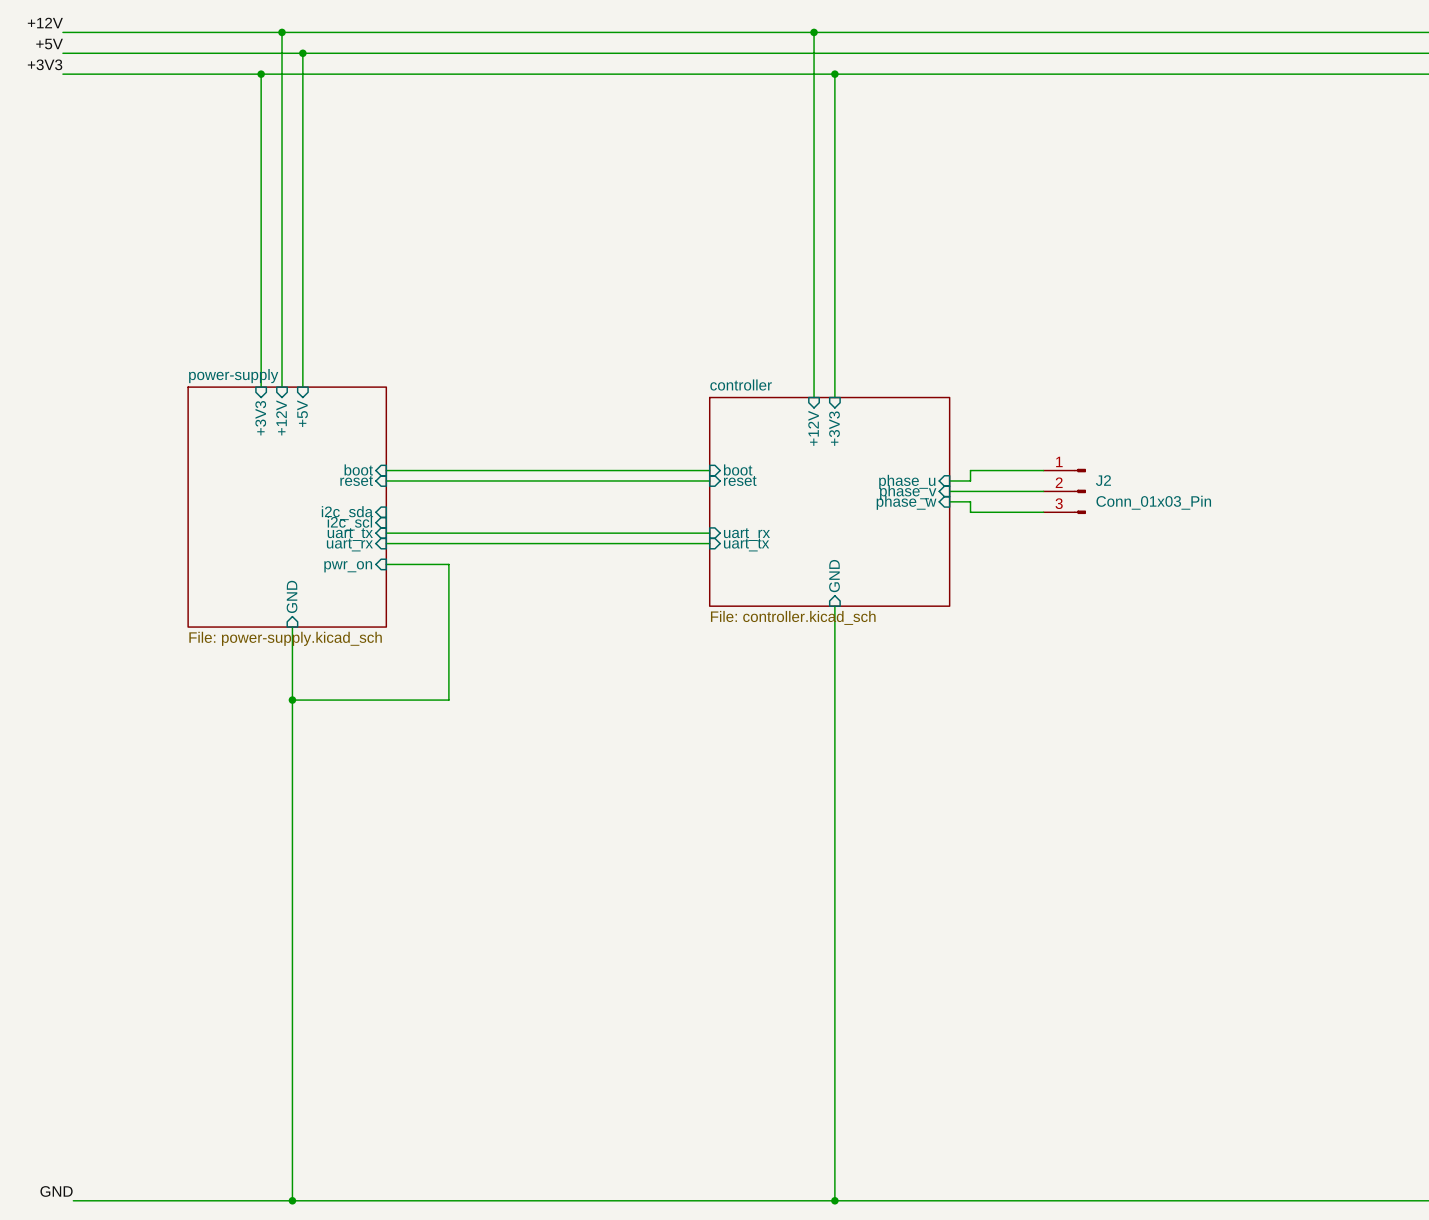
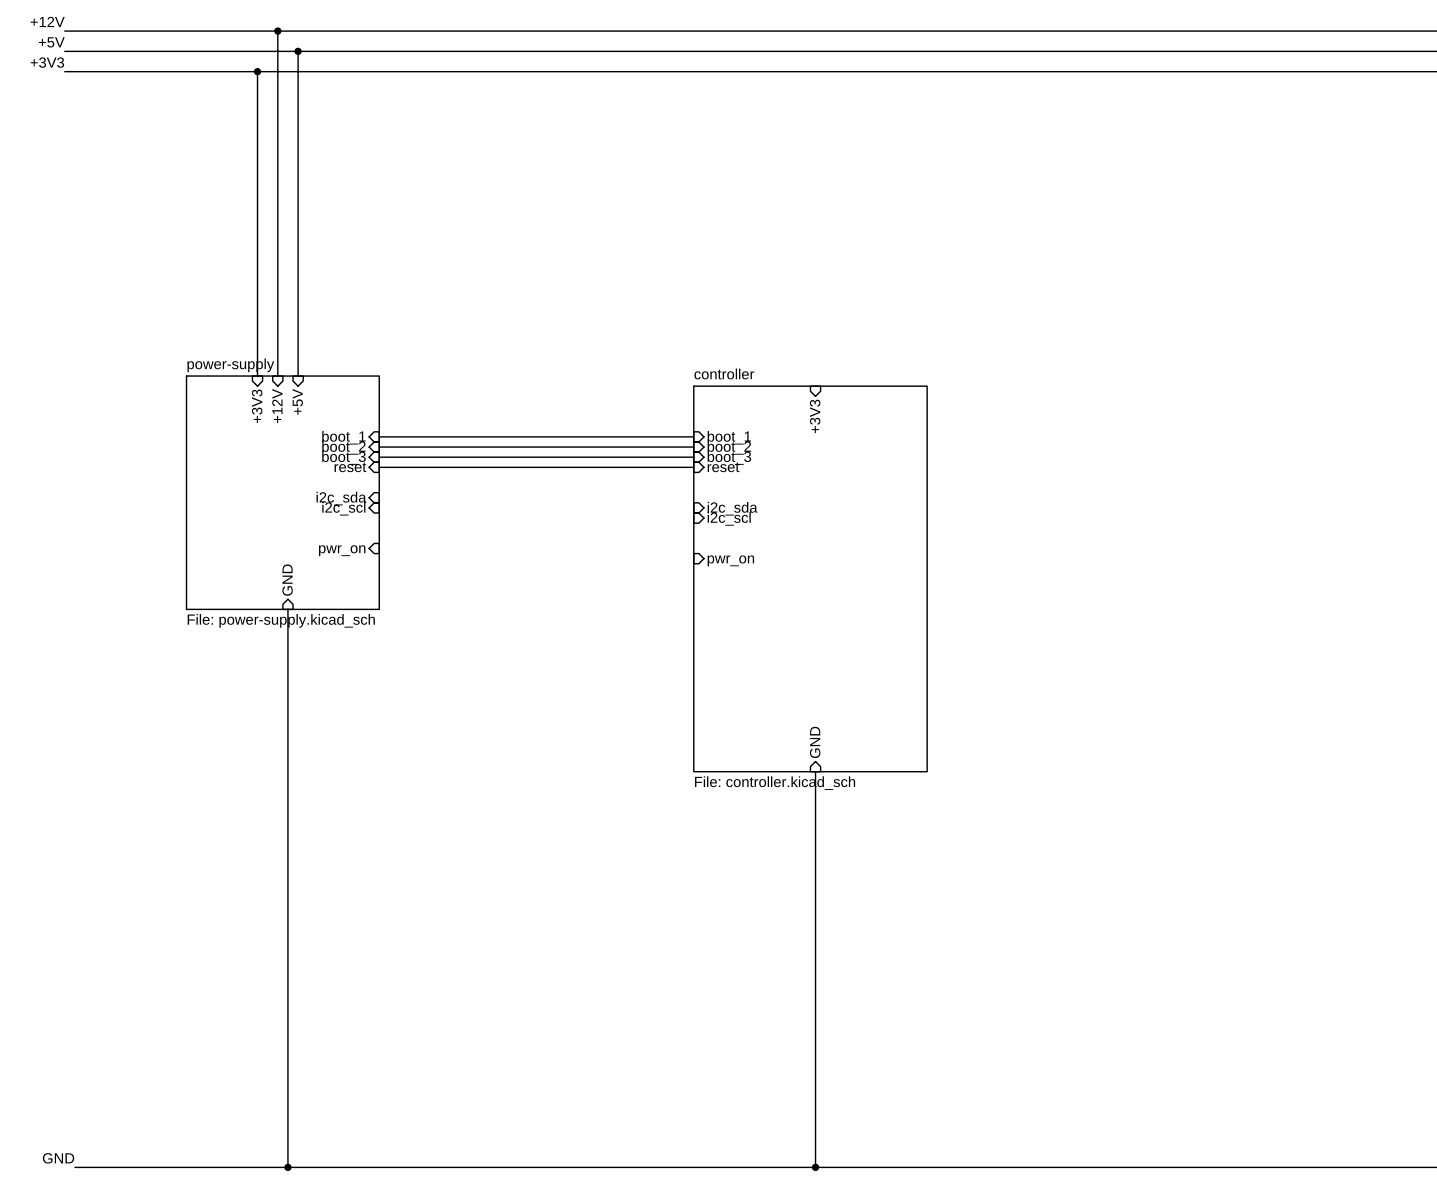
wire: (814, 32) (814, 397) -> none
junction: (814, 32) -> none
wire: (834, 74) (834, 397) -> none
junction: (834, 74) -> none
sheet pin: +12V (813, 428) -> none
sheet pin: none -> boot_1 (343, 437)
sheet pin: none -> boot_1 (729, 437)
sheet pin: none -> boot_2 (343, 447)
sheet pin: none -> boot_2 (729, 447)
sheet pin: boot (358, 469) -> boot_3 (343, 458)
sheet pin: boot (738, 469) -> boot_3 (729, 458)
wire: (1043, 470) (970, 470) (970, 480) (949, 480) -> none
sheet pin: phase_u (907, 481) -> none
wire: (949, 491) (1043, 491) -> none
J2: Conn_01x03_Pin (1064, 491) -> none
sheet pin: phase_v (908, 492) -> none
sheet controller: File: controller.kicad_sch (829, 501) -> none
wire: (949, 501) (970, 501) (970, 512) (1043, 512) -> none
sheet pin: phase_w (906, 502) -> none
sheet pin: none -> i2c_sda (732, 508)
wire: (386, 533) (709, 533) -> (379, 436) (693, 436)
sheet pin: uart_tx (350, 534) -> none
sheet pin: uart_rx (746, 534) -> i2c_scl (729, 518)
wire: (386, 543) (709, 543) -> (379, 447) (693, 447)
sheet pin: uart_rx (349, 545) -> none
sheet pin: uart_tx (746, 545) -> none
wire: (386, 564) (448, 564) (448, 700) (292, 700) -> none
sheet pin position: GND (834, 576) -> GND (815, 742)
sheet pin: none -> pwr_on (730, 560)
sheet controller: none -> File: controller.kicad_sch (810, 578)
wire: (834, 606) (834, 793) -> none
junction: (292, 700) -> none

